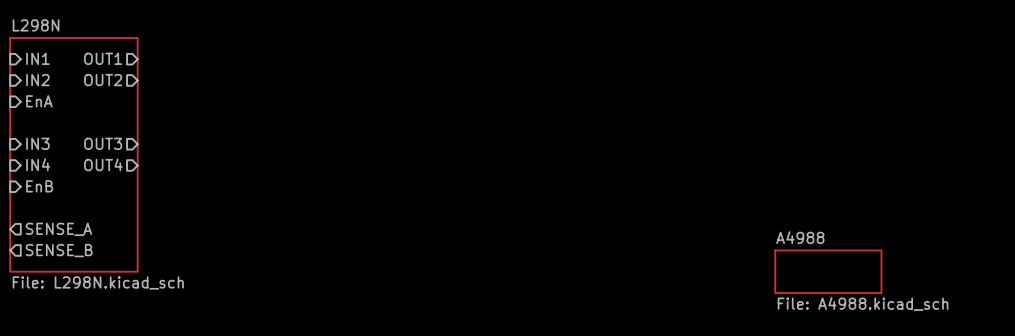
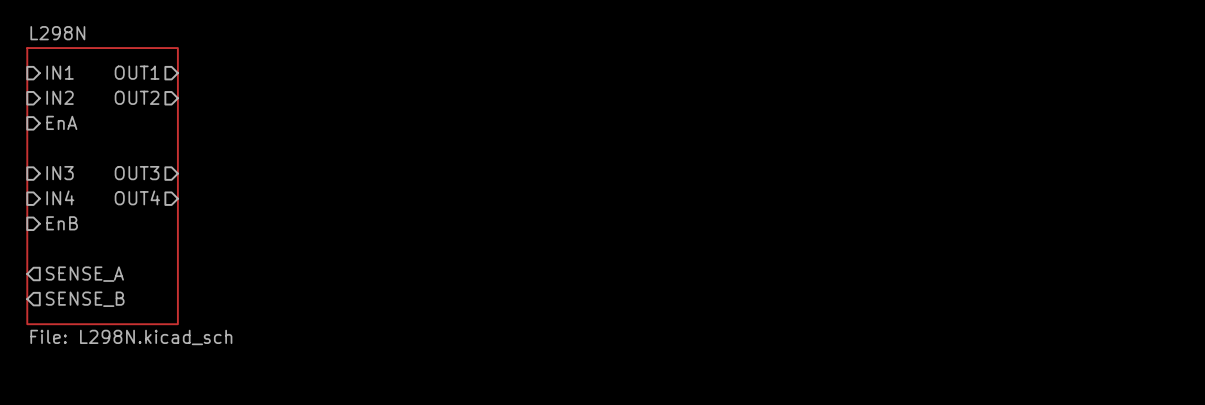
sheet A4988: File: A4988.kicad_sch (828, 271) -> none

